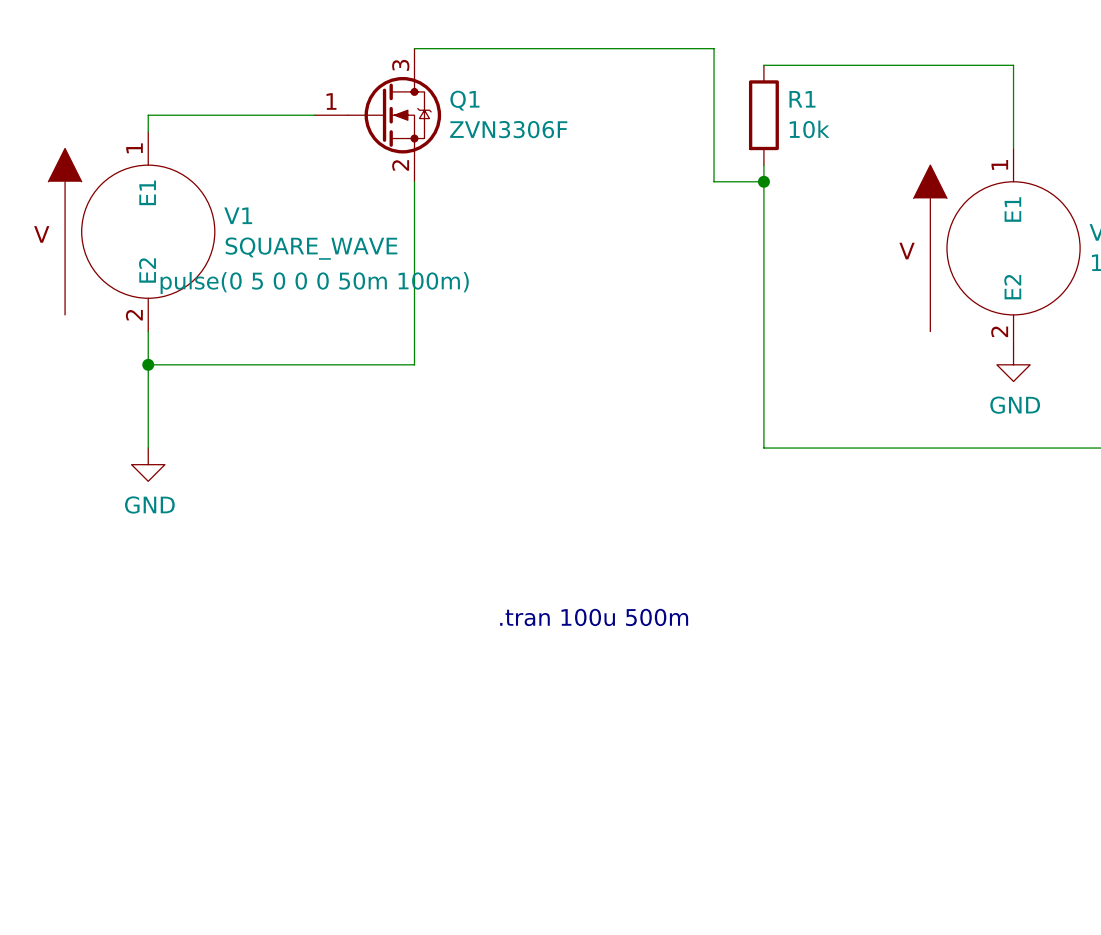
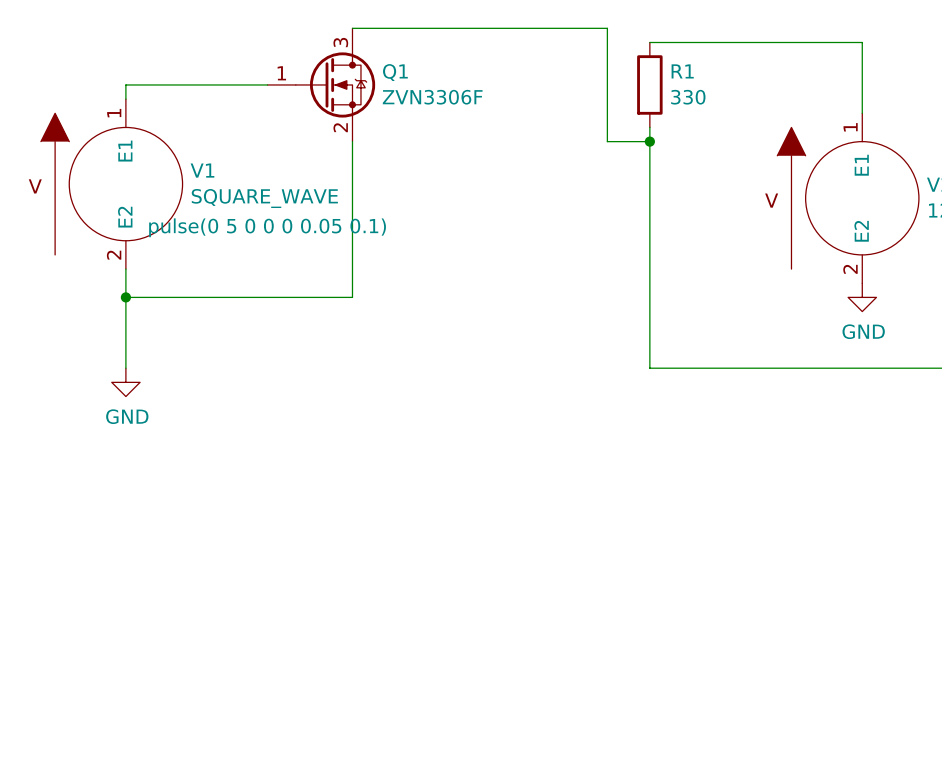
R1 value: 10k (809, 129) -> 330 (688, 97)
V1 text: pulse(0 5 0 0 0 50m 100m) (314, 283) -> pulse(0 5 0 0 0 0.05 0.1) (267, 227)
text: .tran 100u 500m (594, 617) -> none

